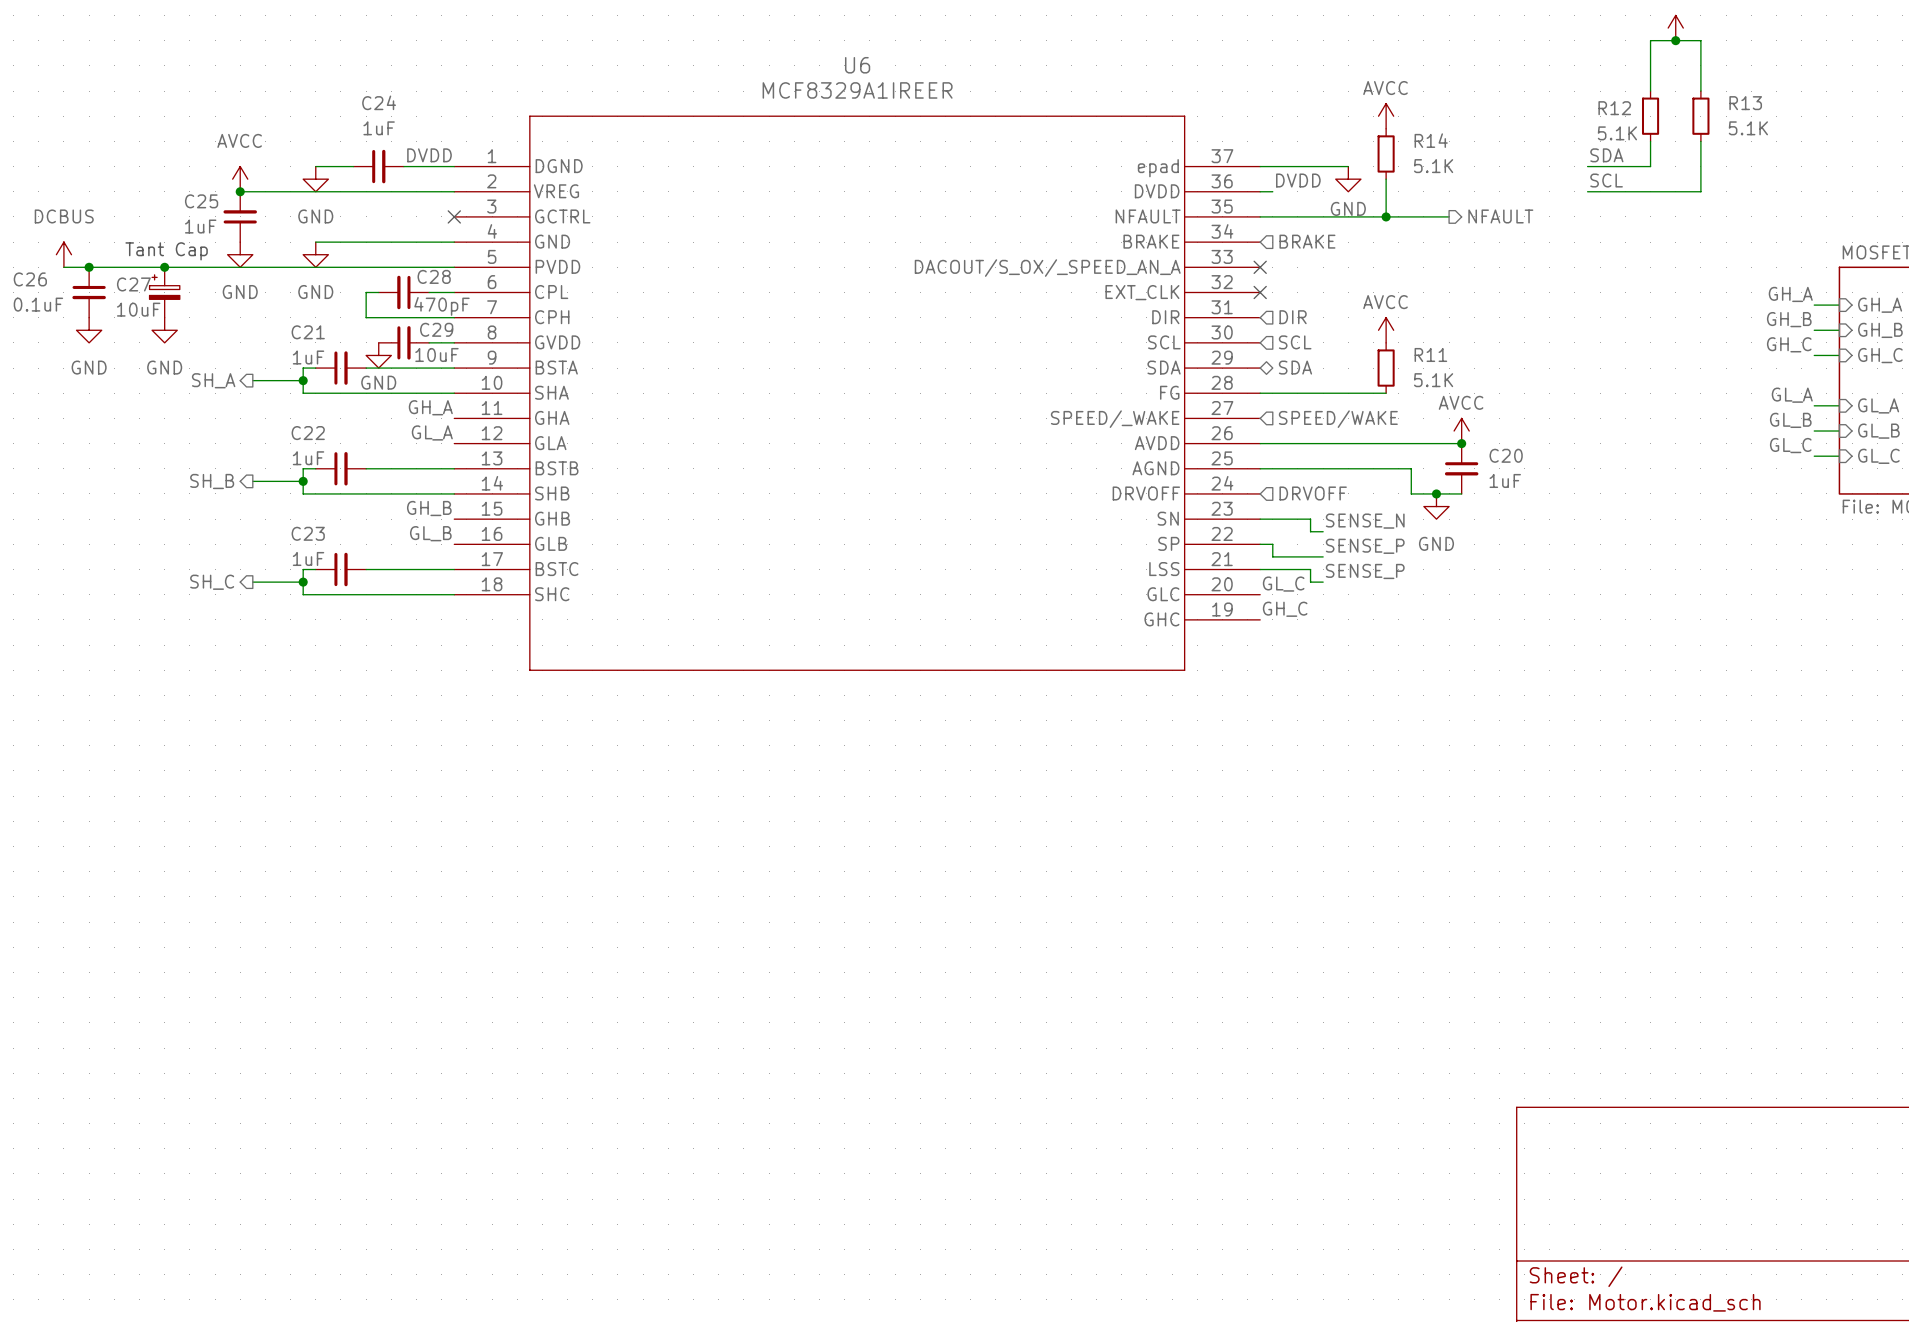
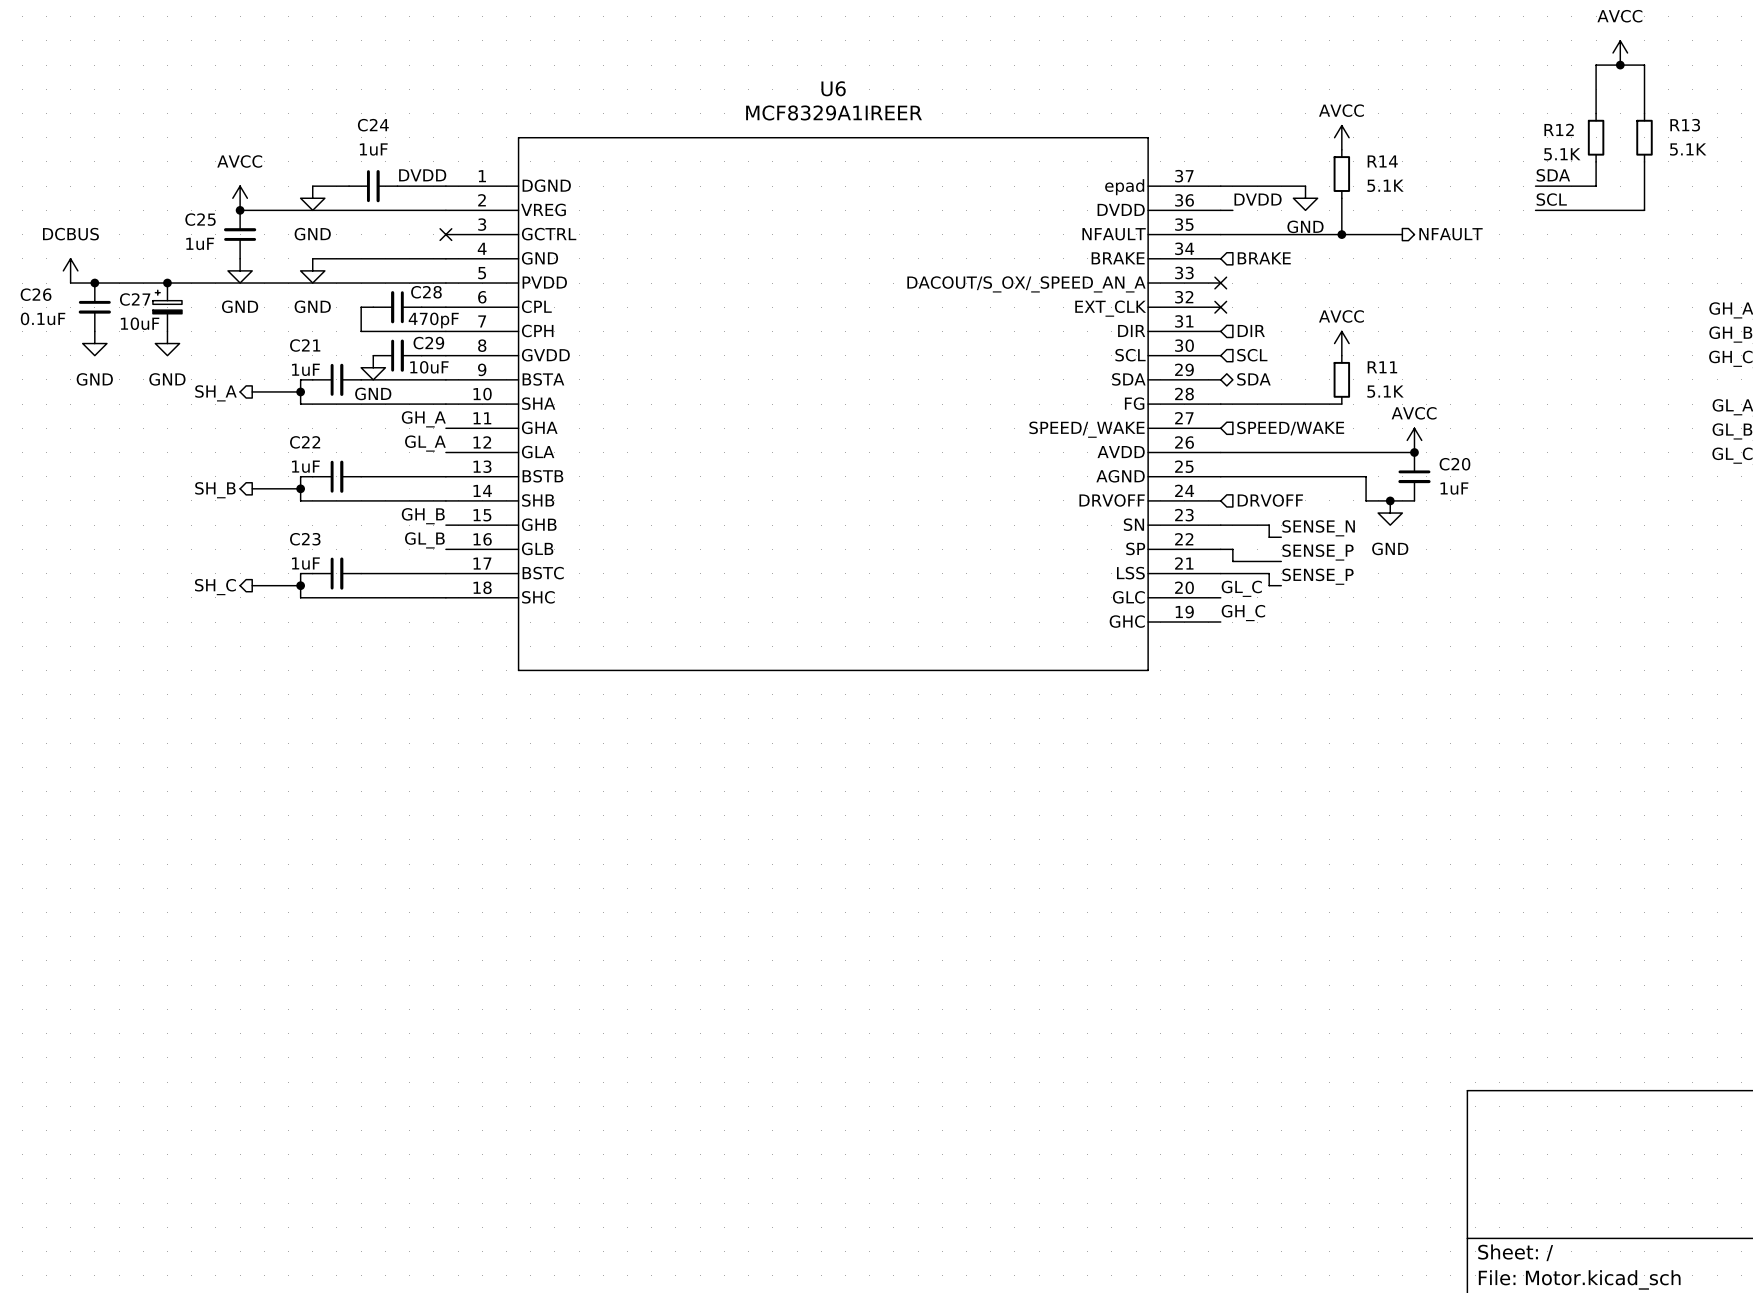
text: Tant Cap (166, 251) -> none

